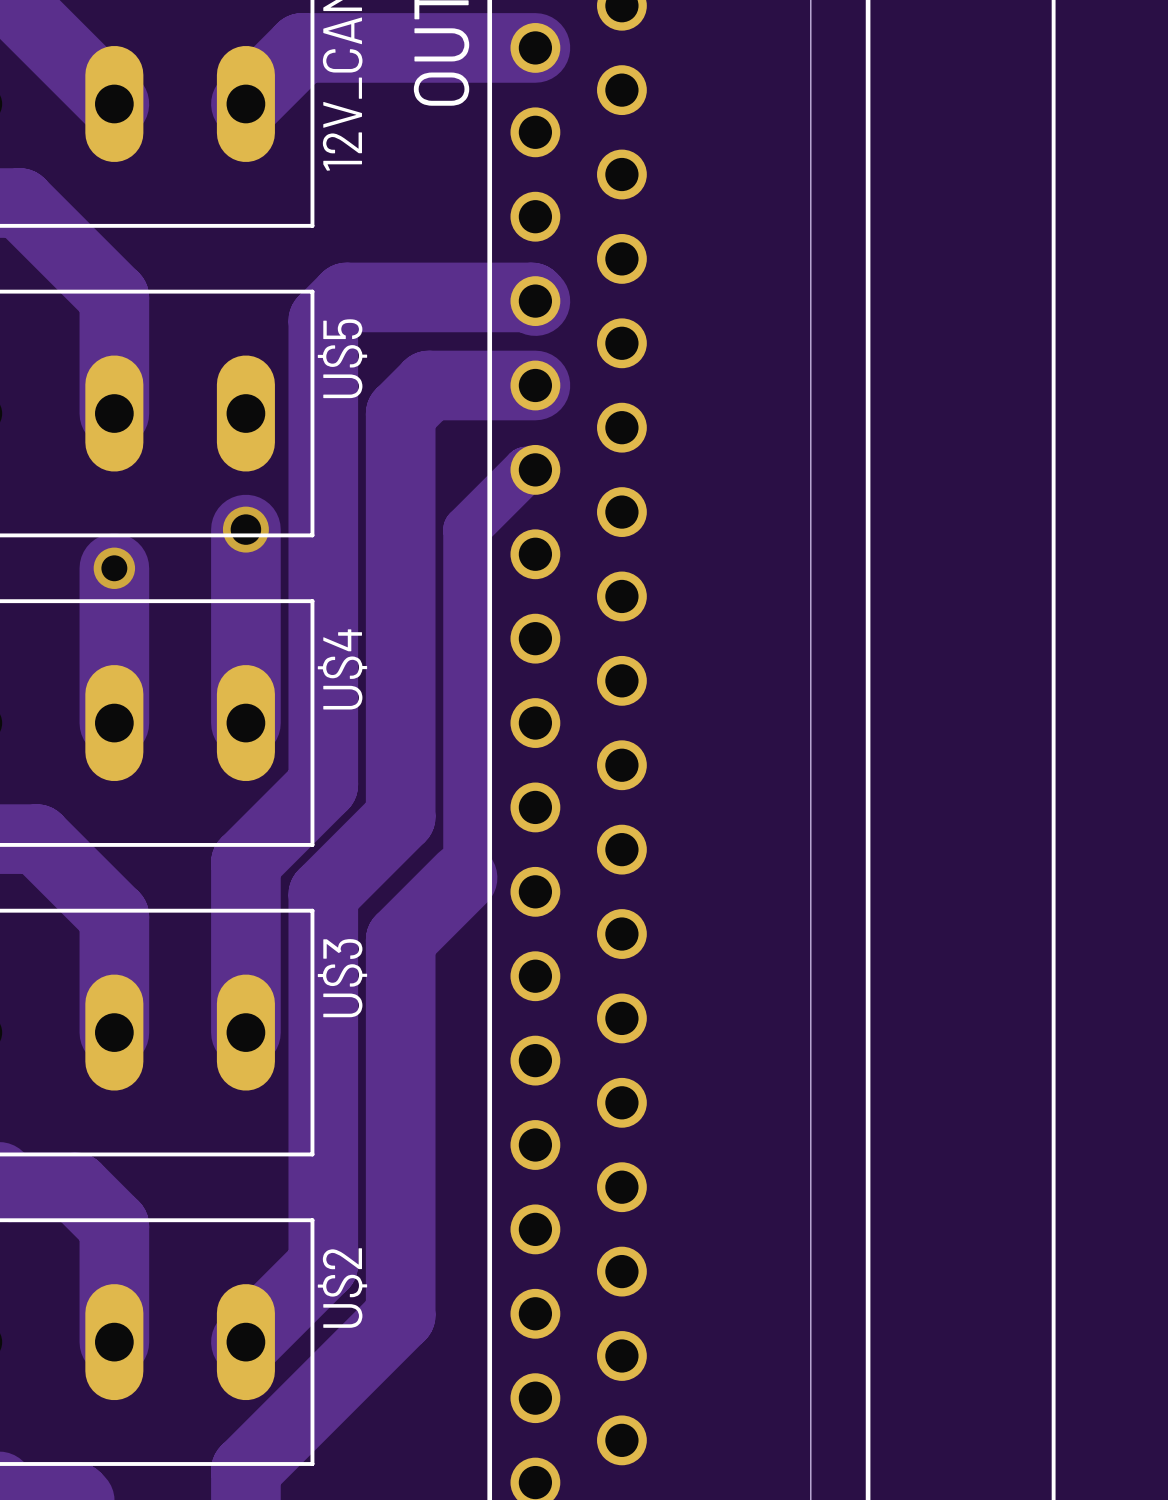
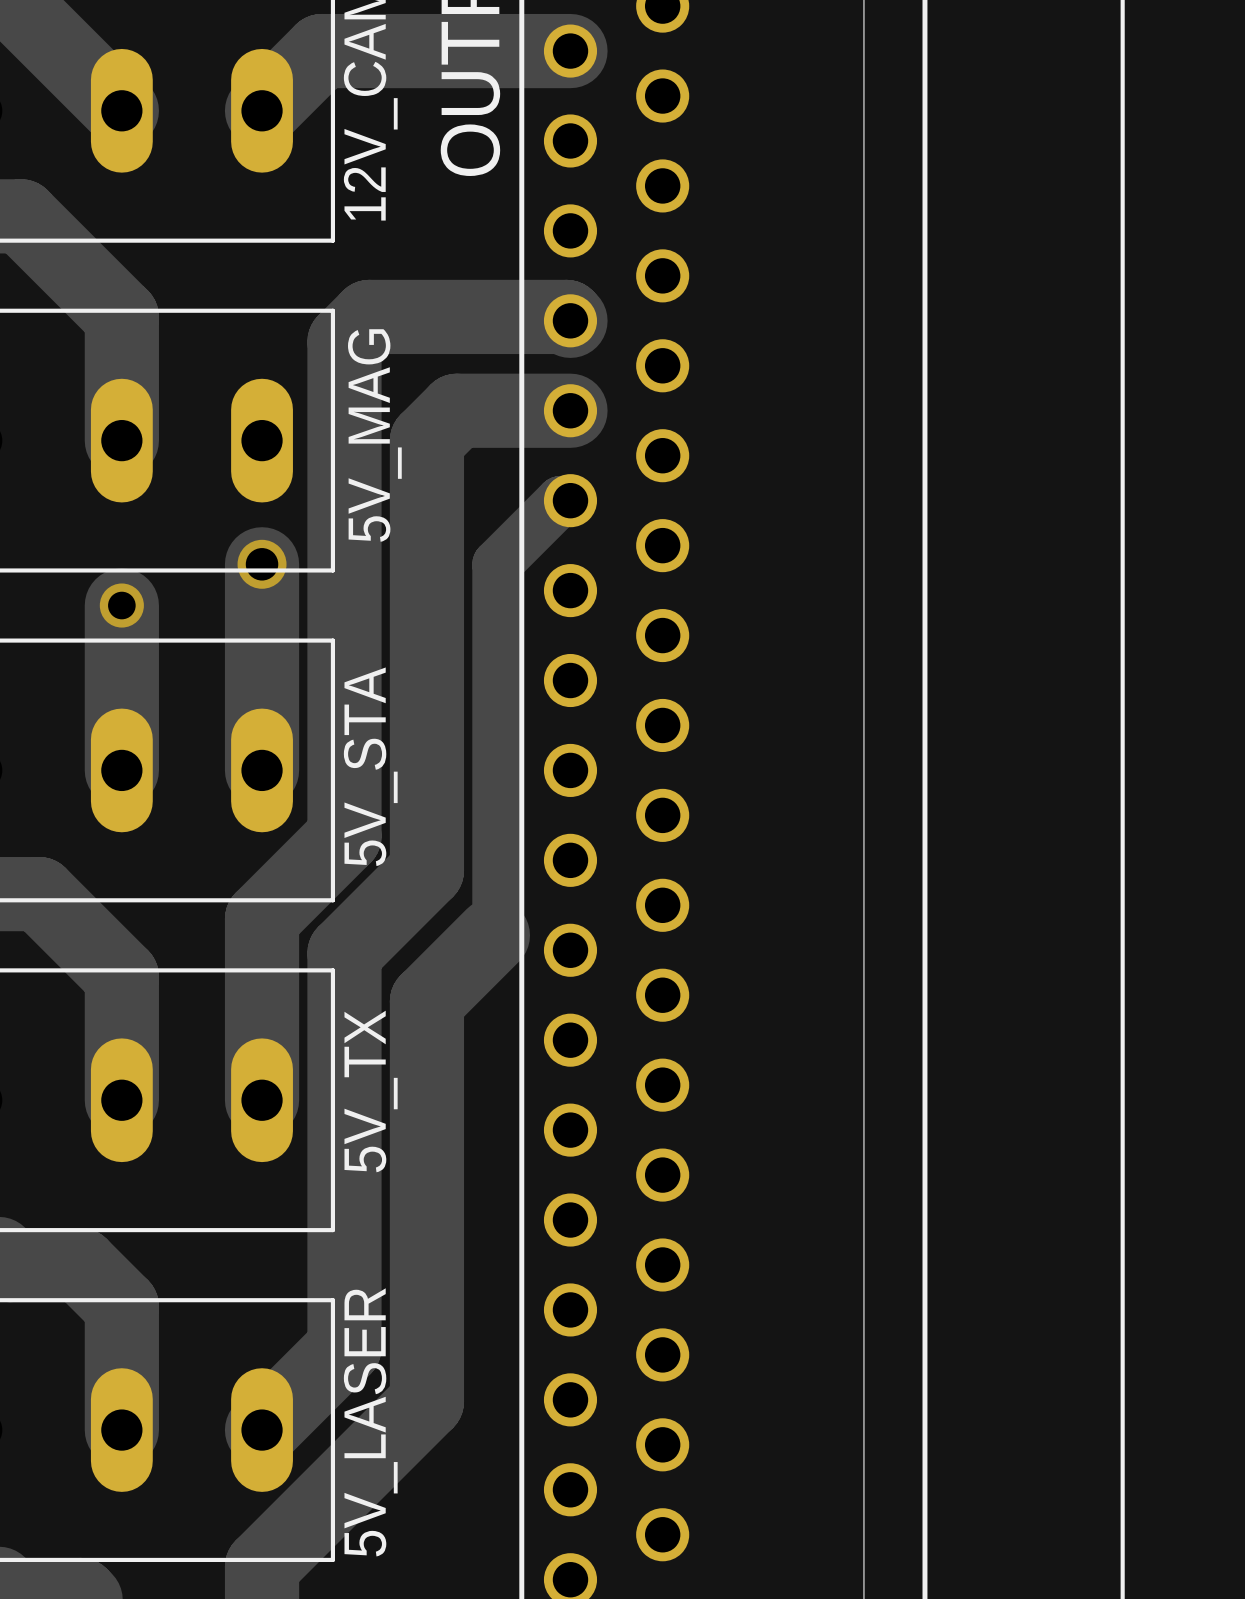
U$5 name: U$5 (342, 358) -> 5V_MAG (374, 435)
U$4 name: U$4 (342, 669) -> 5V_STA (370, 766)
U$3 name: U$3 (342, 978) -> 5V_TX (371, 1091)
U$2 name: U$2 (342, 1288) -> 5V_LASER (370, 1422)

